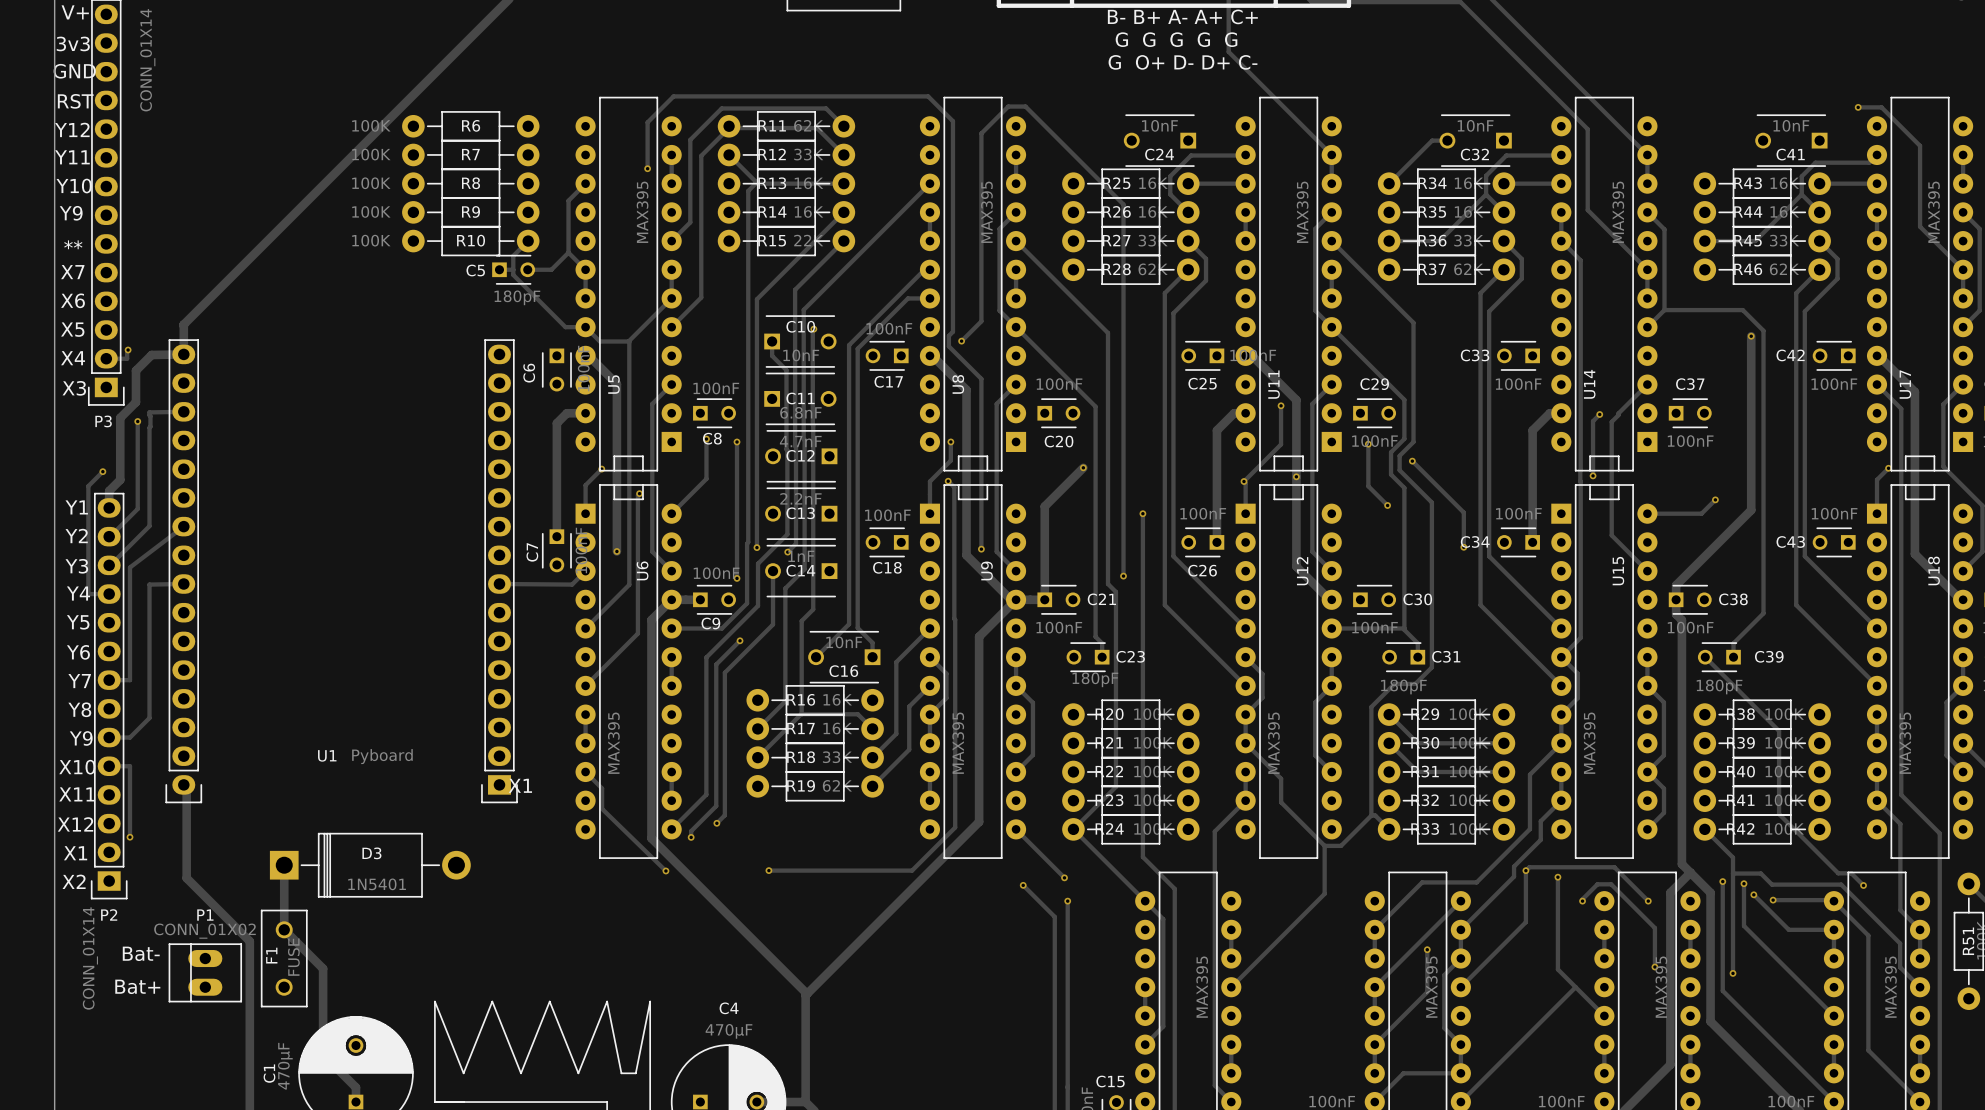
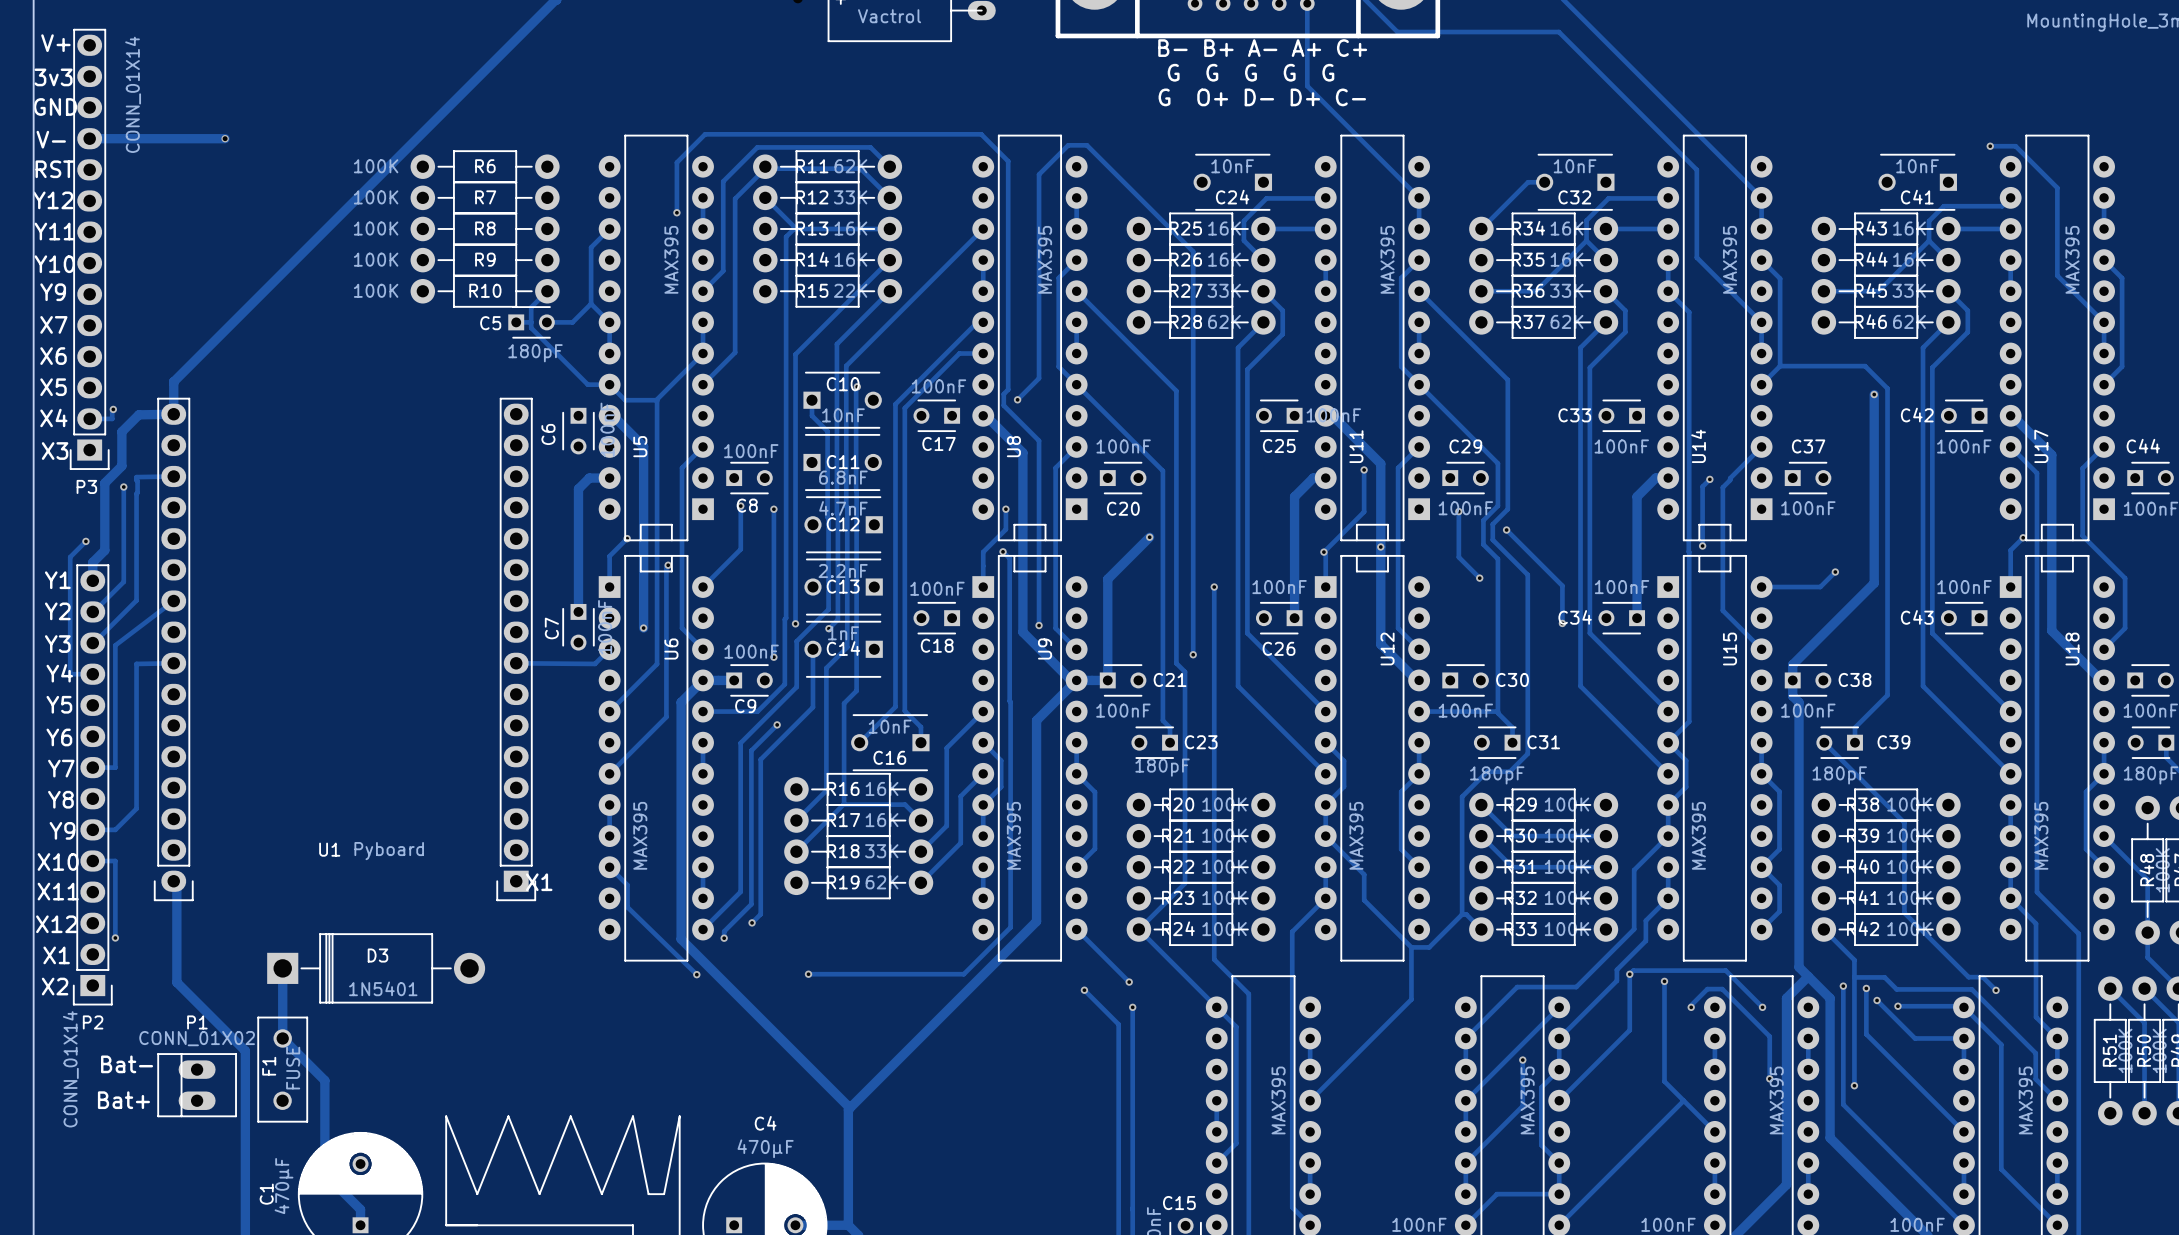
track: none -> (89, 138) (225, 138)
via: none -> (225, 138)
text: RST (75, 101) -> V- (51, 139)
text: Y12 (72, 129) -> RST (54, 169)
text: Y11 (72, 157) -> Y12 (53, 200)
text: Y10 (74, 186) -> Y11 (54, 231)
text: Y9 (71, 213) -> Y10 (54, 264)
text: ** (73, 244) -> Y9 (53, 292)

